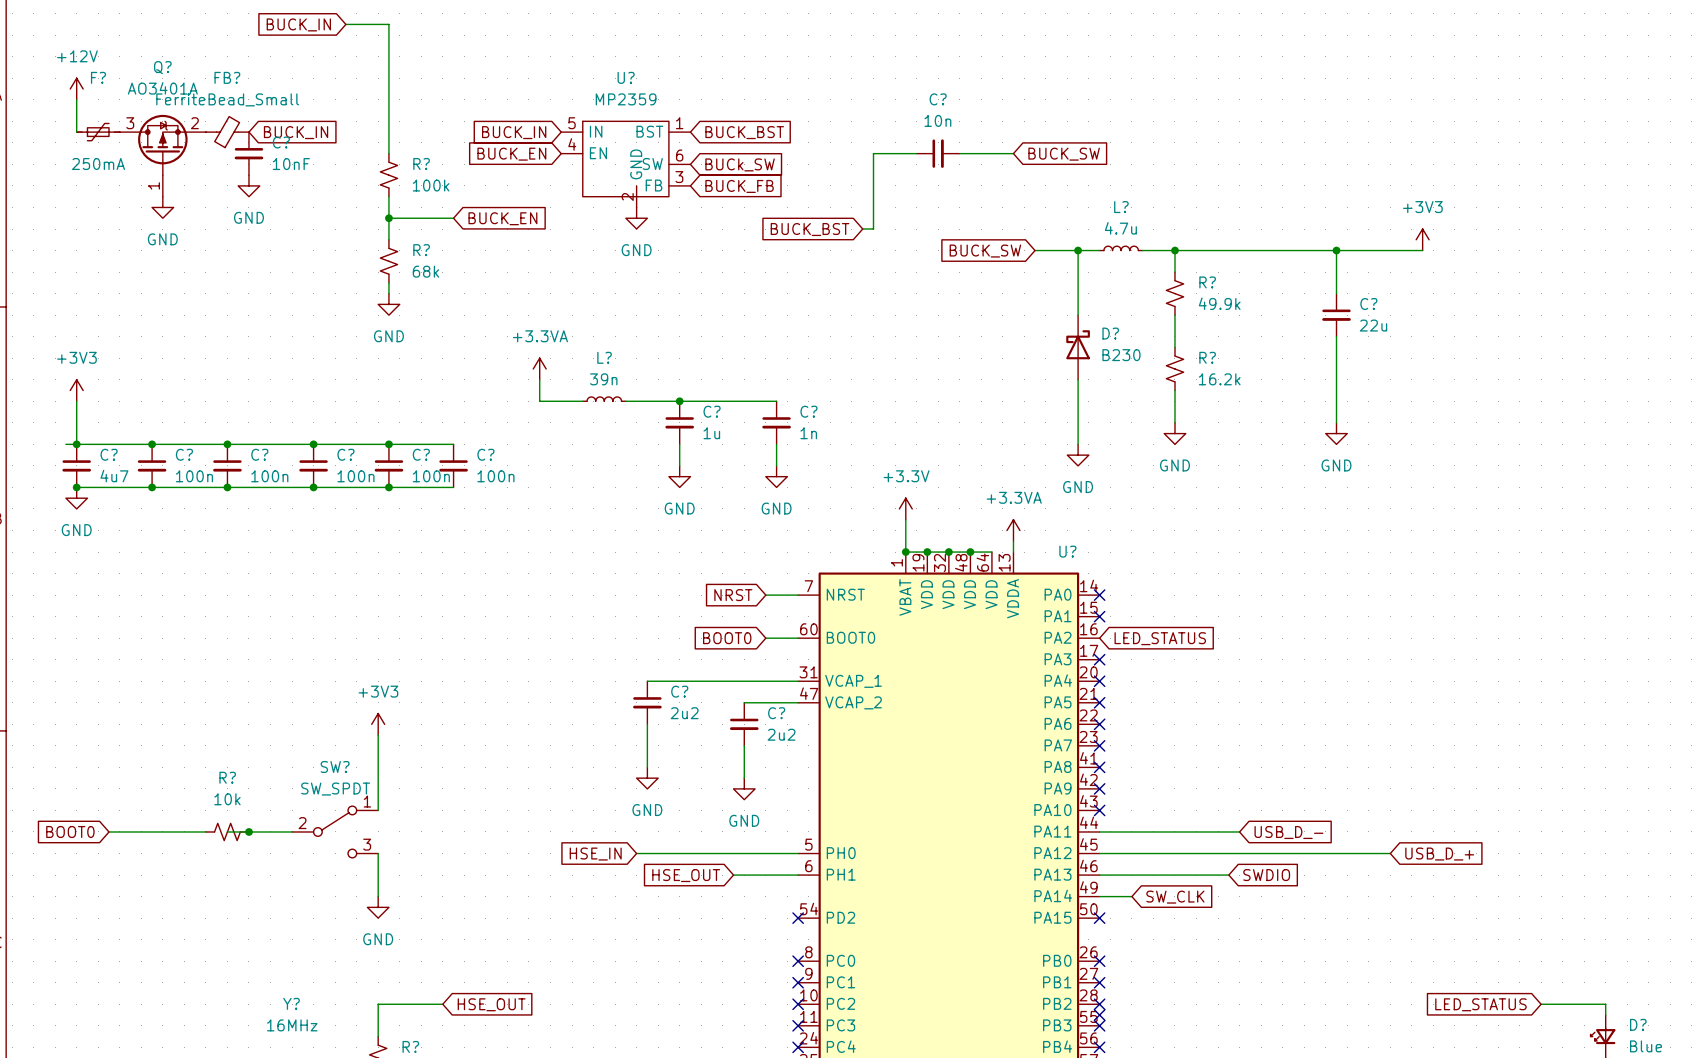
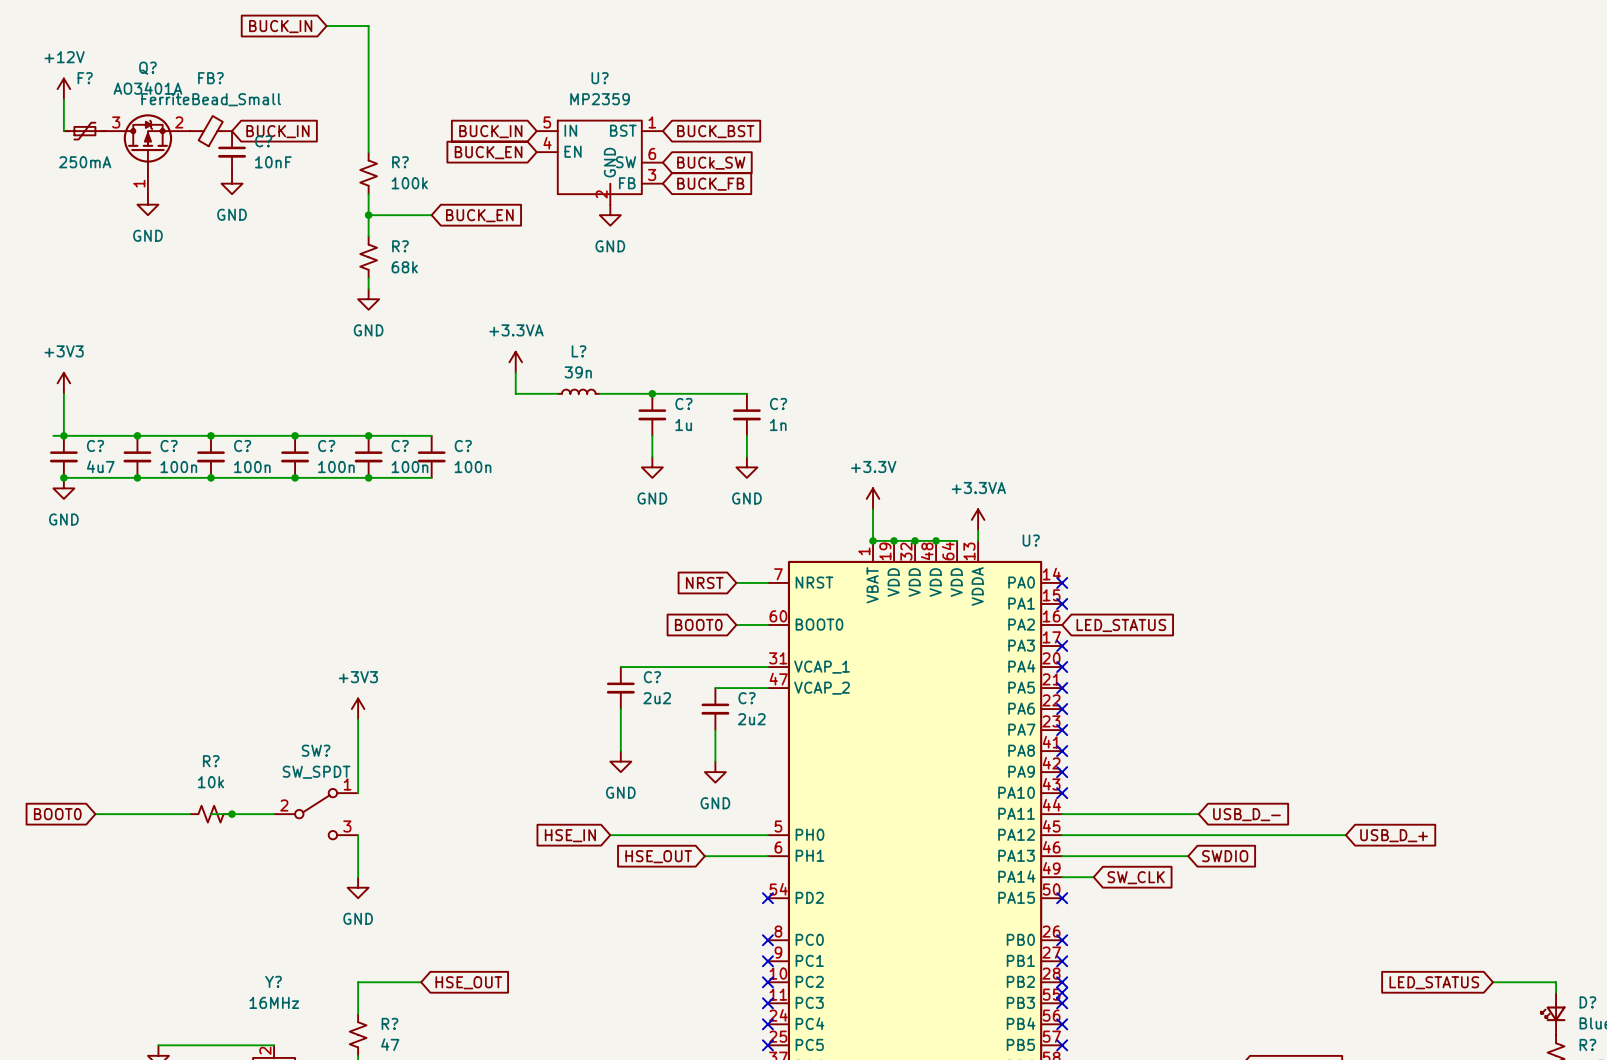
wire: (916, 153) (873, 153) (873, 229) (862, 229) -> none
C?: 10n (938, 153) -> none
wire: (959, 153) (1013, 153) -> none
global label: BUCK_SW (1064, 154) -> none
global label: BUCK_BST (810, 229) -> none
power symbol: +3V3 (1422, 239) -> none
L?: 4.7u (1121, 248) -> none
wire: (1035, 250) (1099, 250) -> none
wire: (1078, 250) (1078, 315) -> none
junction: (1078, 250) -> none
wire: (1142, 250) (1422, 250) -> none
wire: (1174, 250) (1174, 272) -> none
junction: (1174, 250) -> none
wire: (1336, 250) (1336, 293) -> none
junction: (1336, 250) -> none
global label: BUCK_SW (985, 251) -> none
R?: 49.9k (1174, 293) -> none
wire: (1174, 315) (1174, 347) -> none
C?: 22u (1336, 315) -> none
wire: (1336, 336) (1336, 422) -> none
D?: B230 (1078, 347) -> none
R?: 16.2k (1174, 368) -> none
wire: (1078, 379) (1078, 444) -> none
wire: (1174, 390) (1174, 422) -> none
power symbol: GND (1174, 433) -> none
power symbol: GND (1336, 433) -> none
power symbol: GND (1078, 455) -> none

